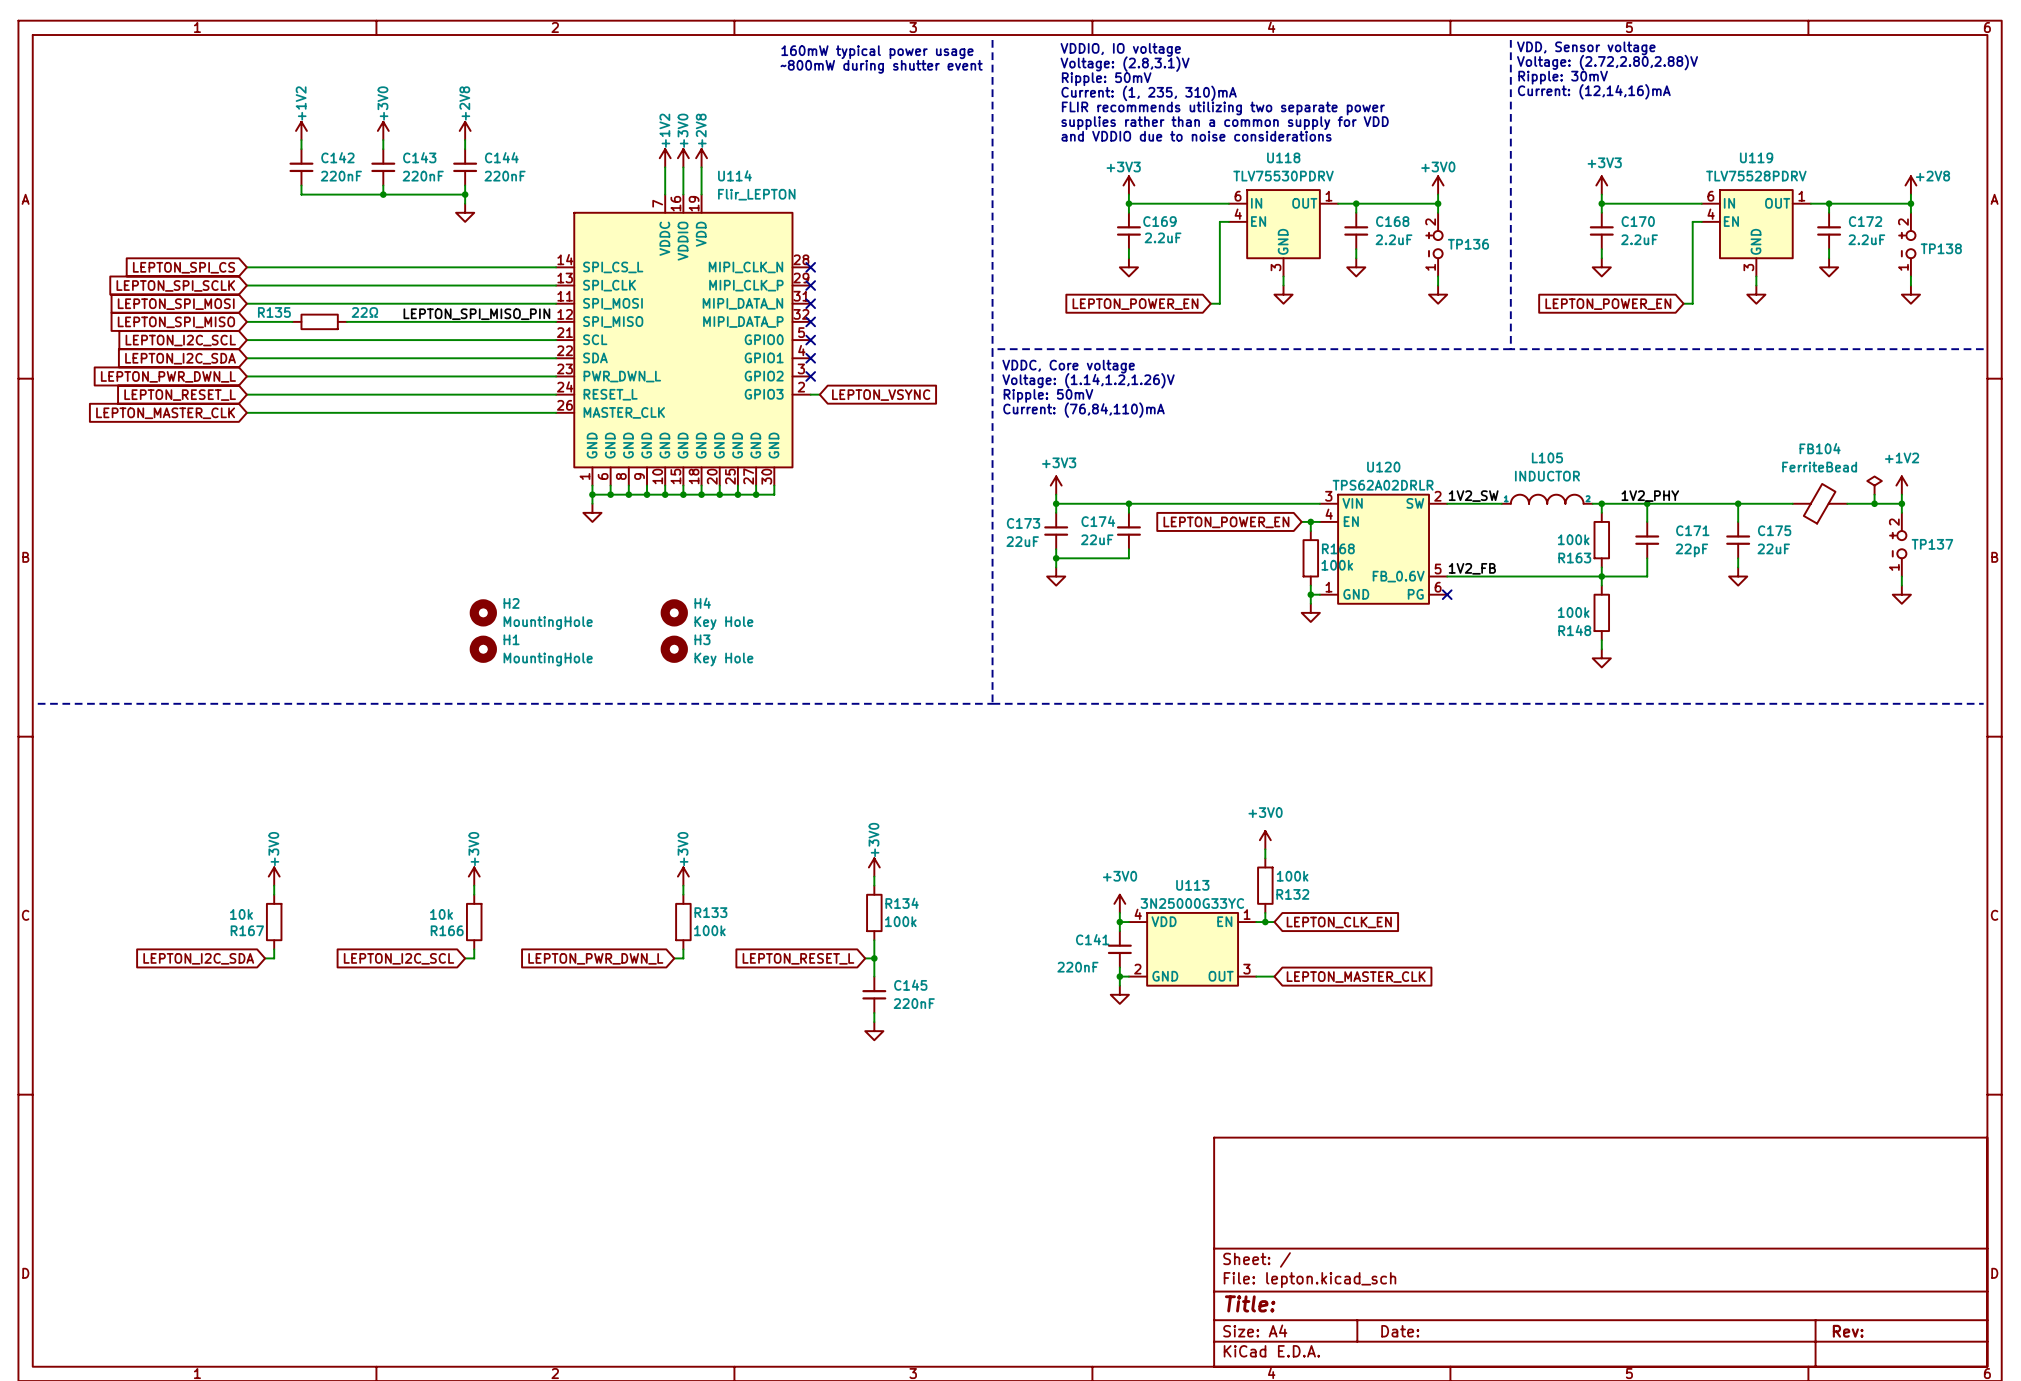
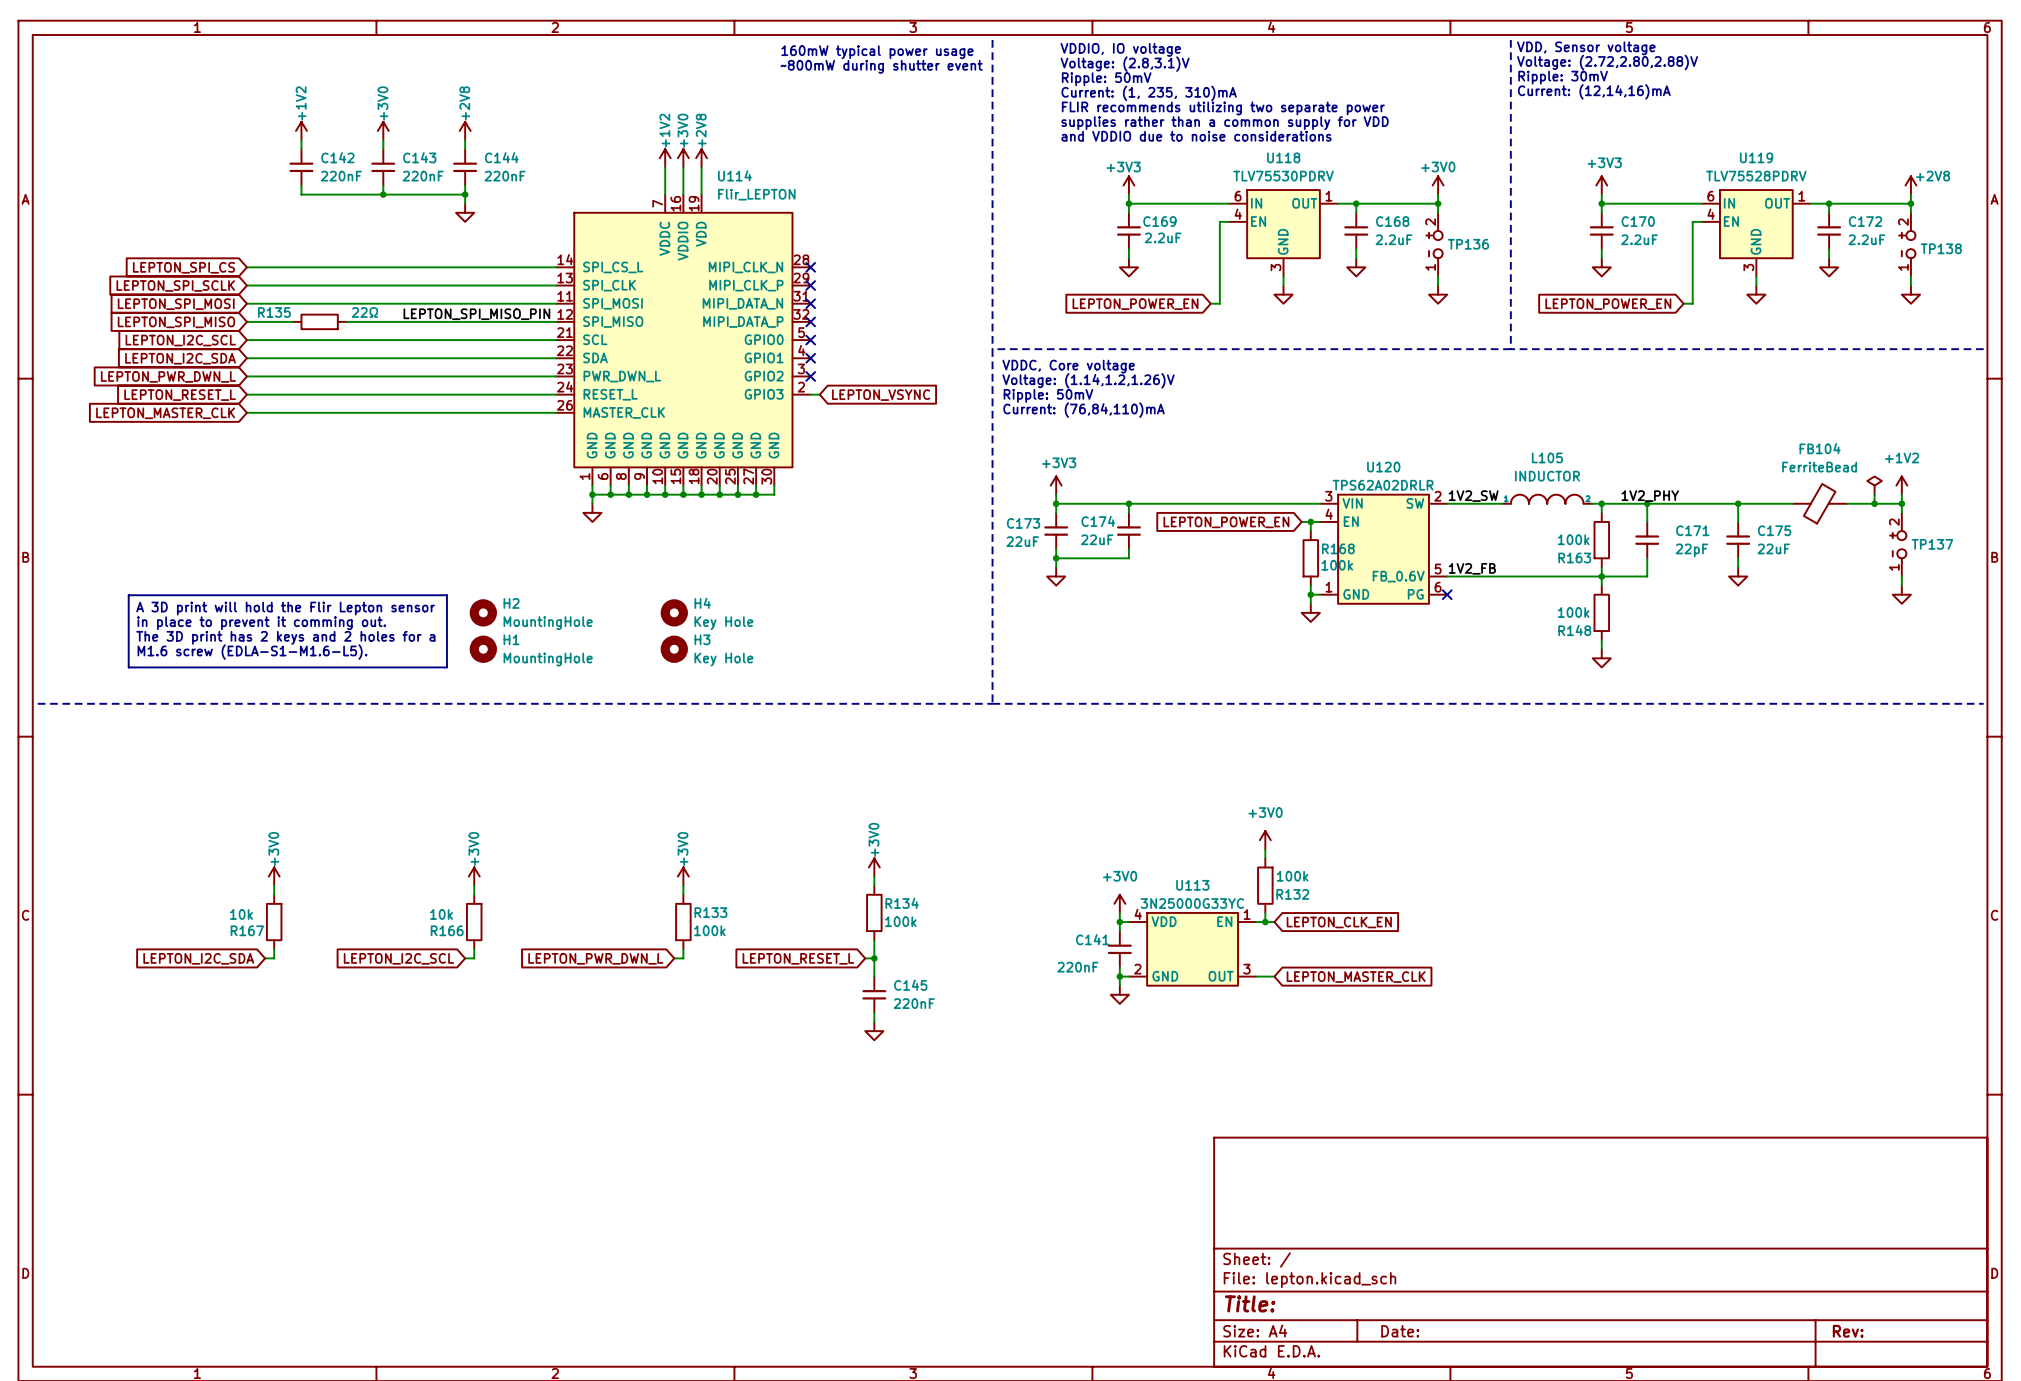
line: none -> (128, 595) (446, 595) (446, 667) (128, 667) (128, 595)
text: none -> A 3D print will hold the Flir Lepton sensor (285, 608)
text: none -> in place to prevent it comming out. (261, 623)
text: none -> The 3D print has 2 keys and 2 holes for a (285, 637)
text: none -> M1.6 screw (EDLA-S1-M1.6-L5). (252, 652)

